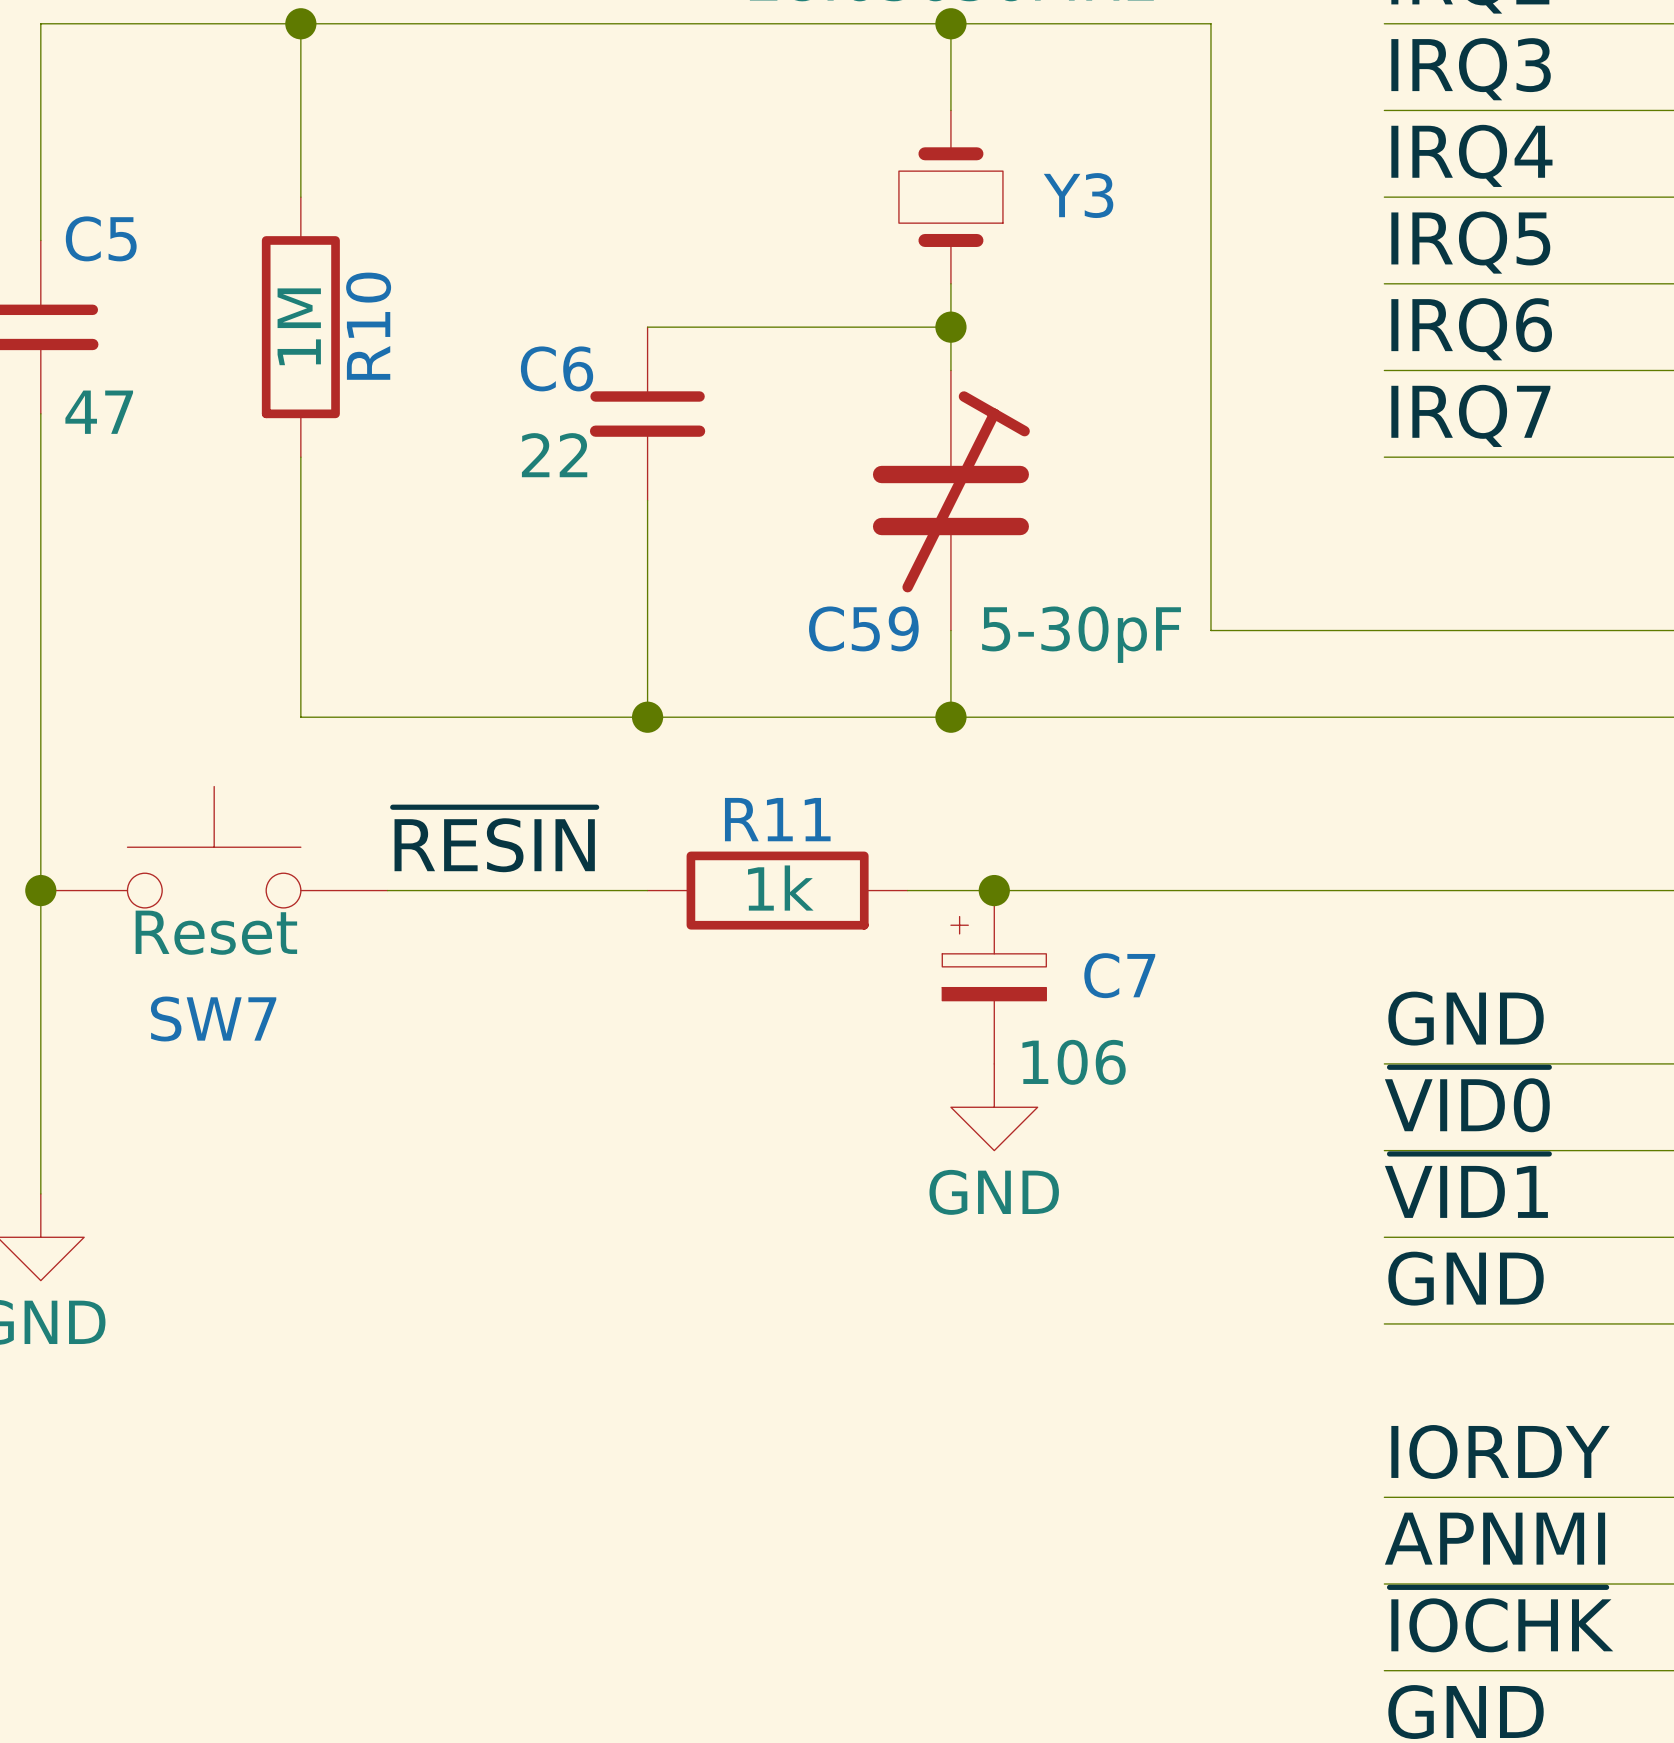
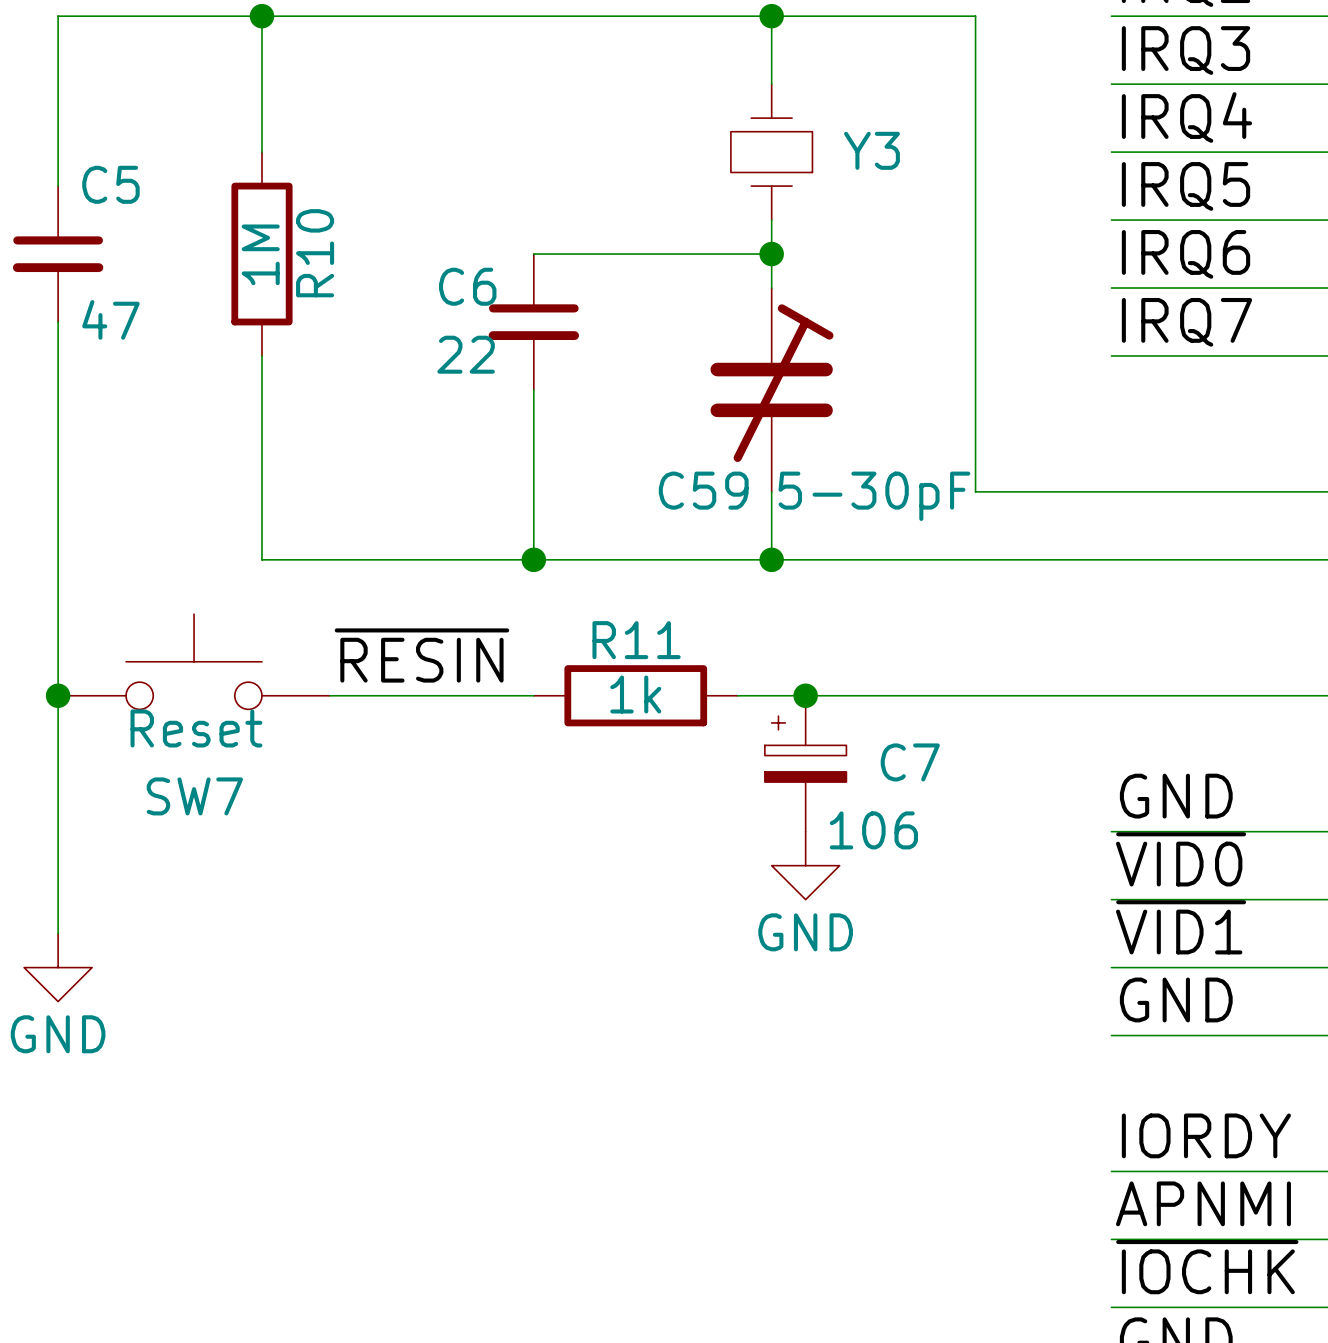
Y3 symbol: [898, 110, 1003, 284] -> [730, 84, 813, 221]

